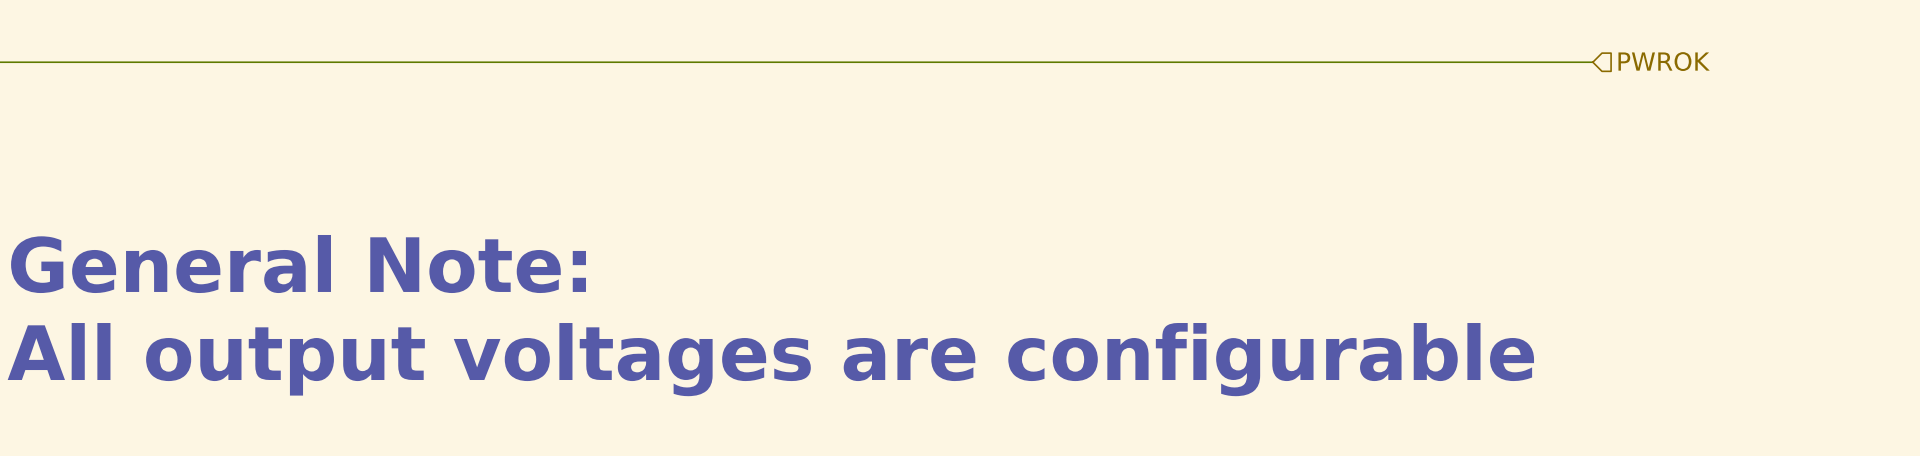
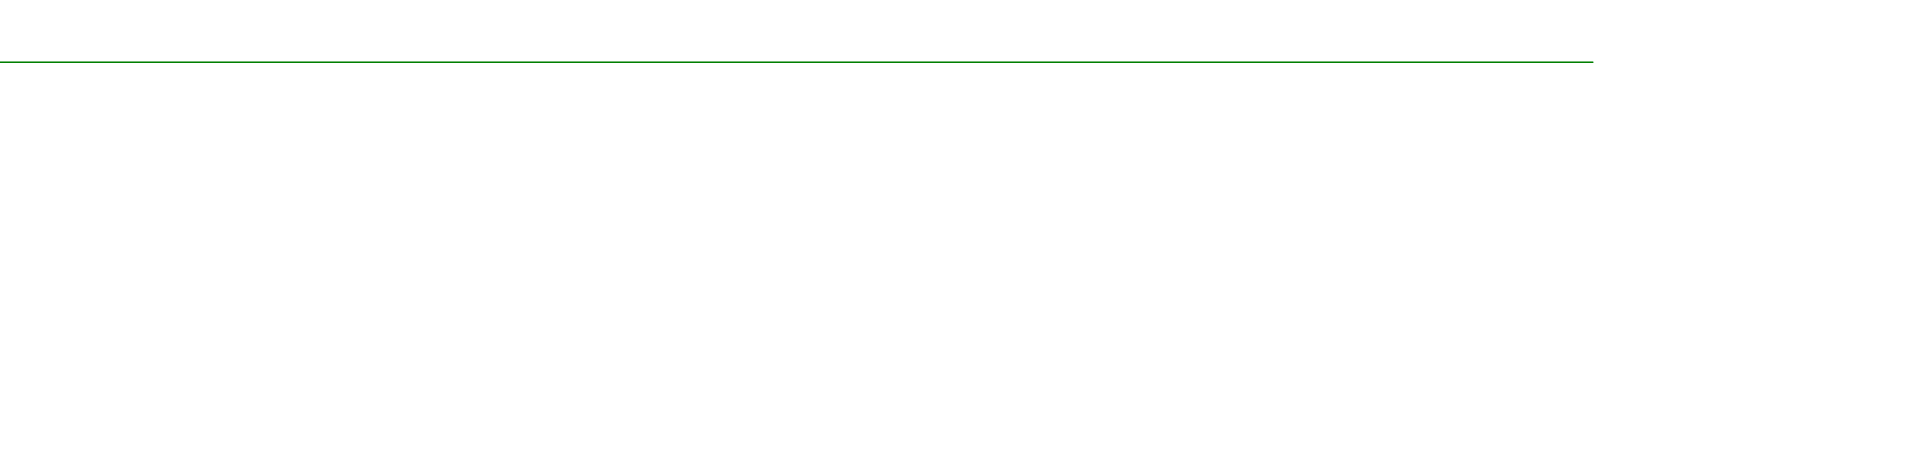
hierarchical label: PWROK (1664, 61) -> none
text: General Note: (298, 264) -> none
text: All output voltages are configurable (770, 359) -> none

